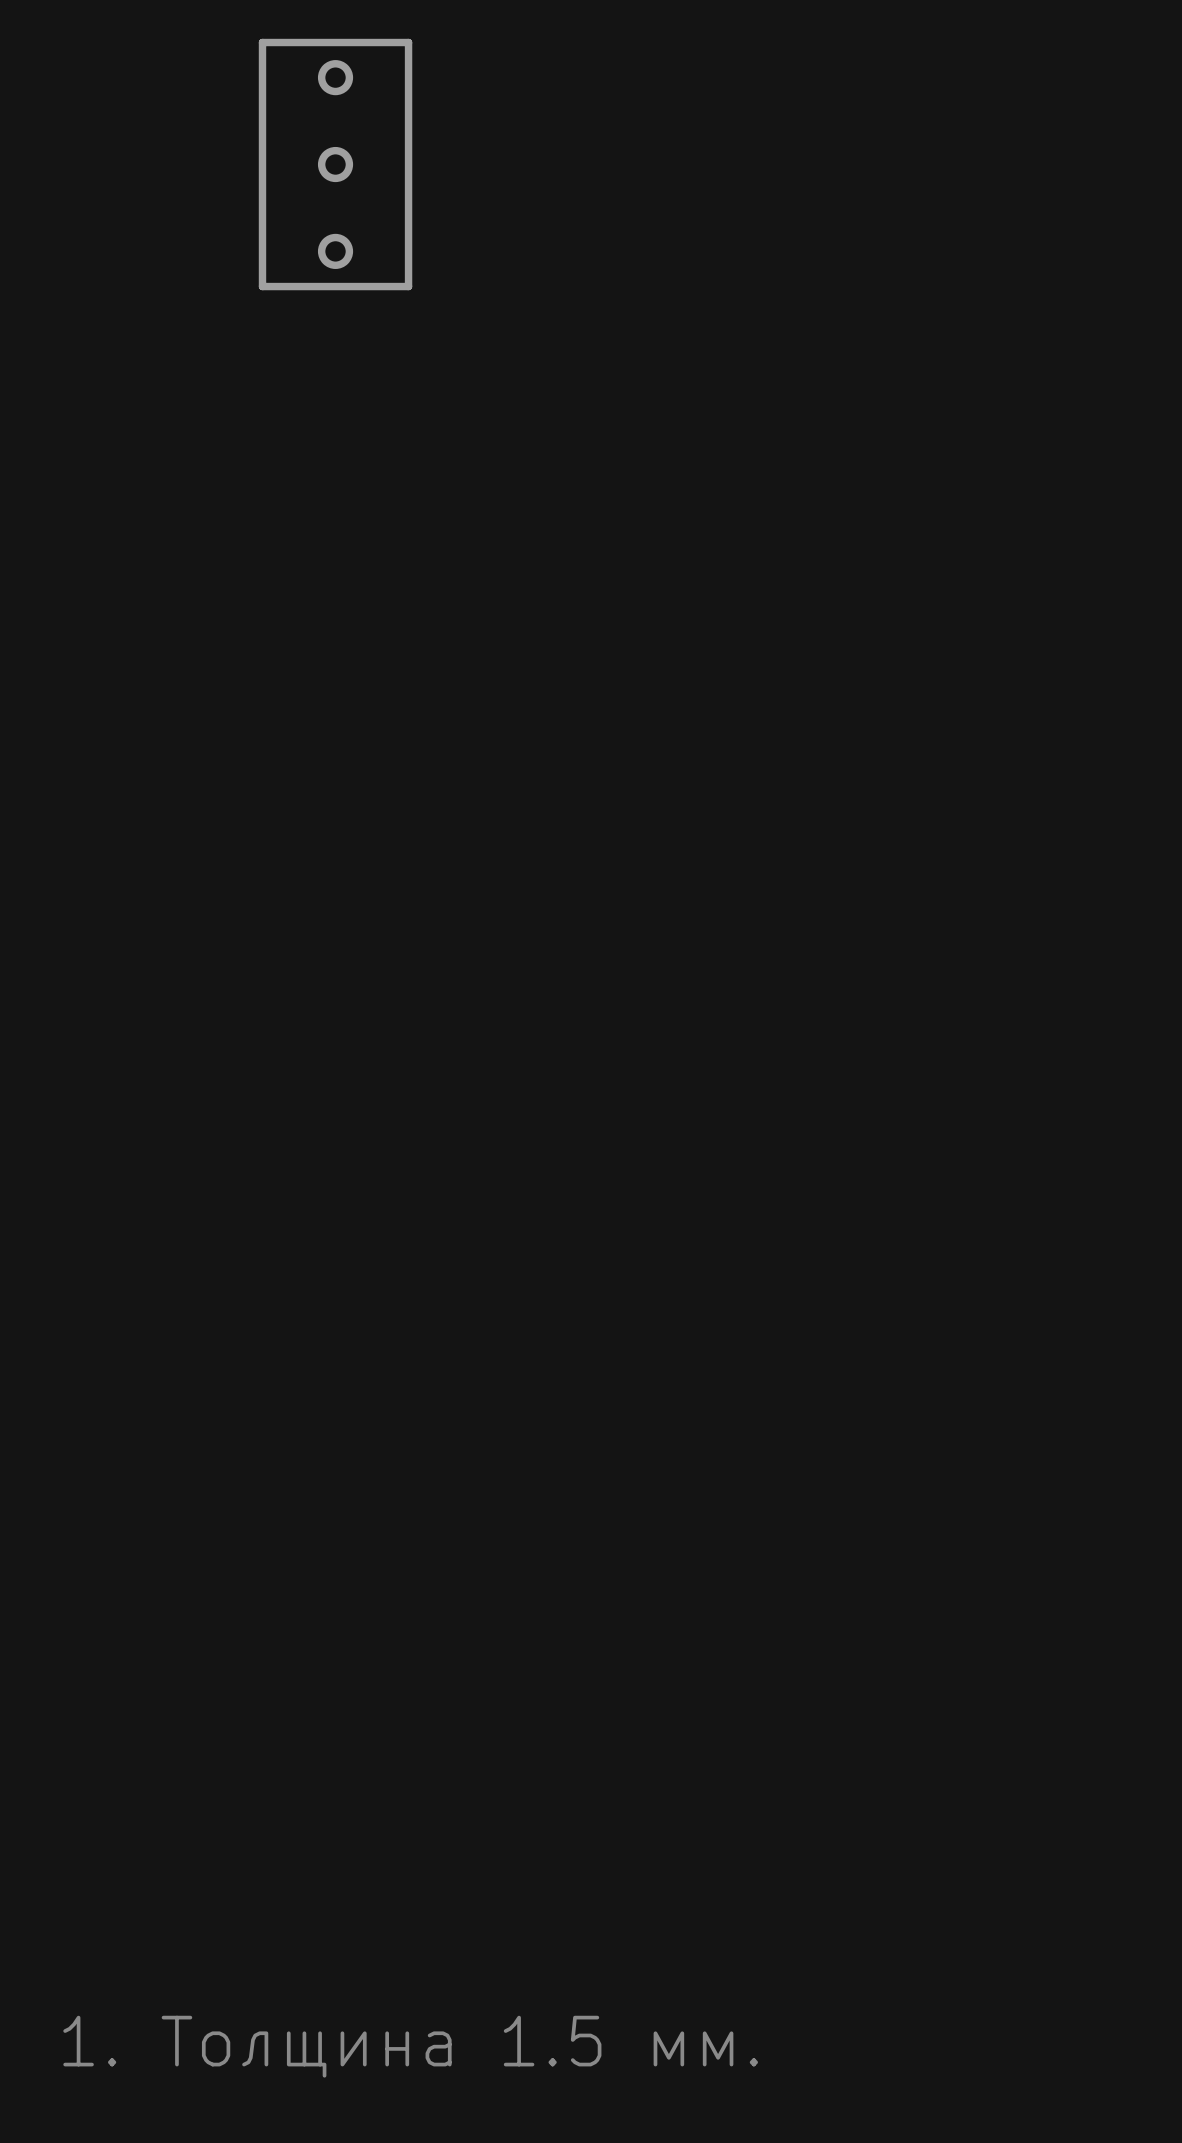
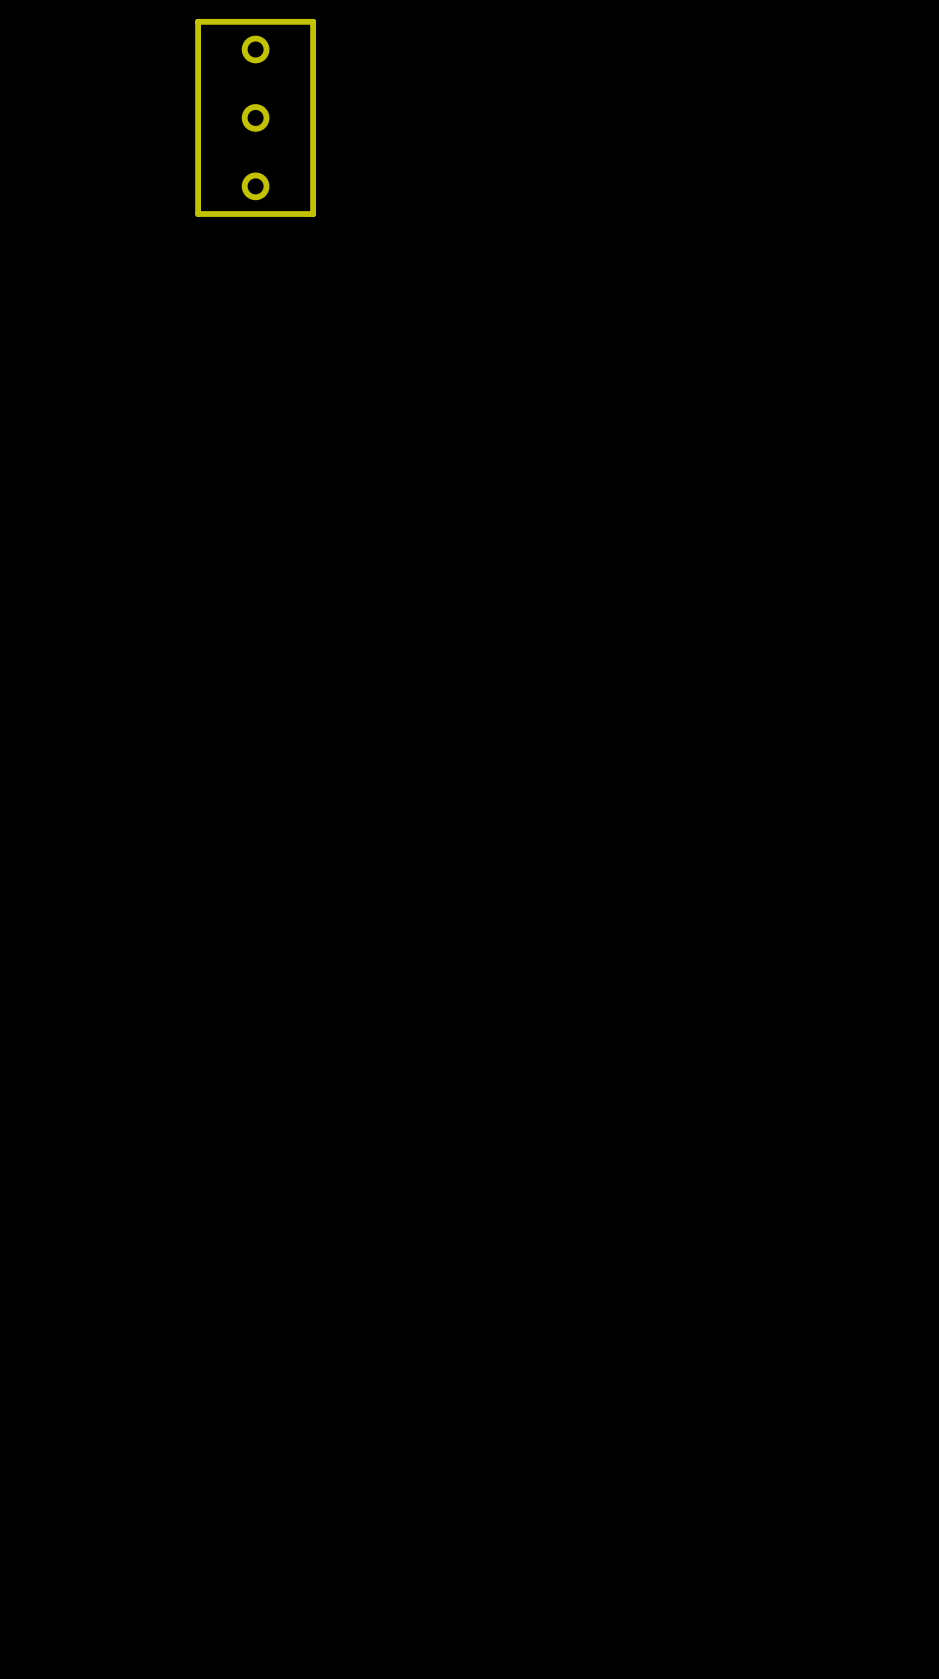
text: 1. Толщина 1.5 мм. (410, 2046) -> none

